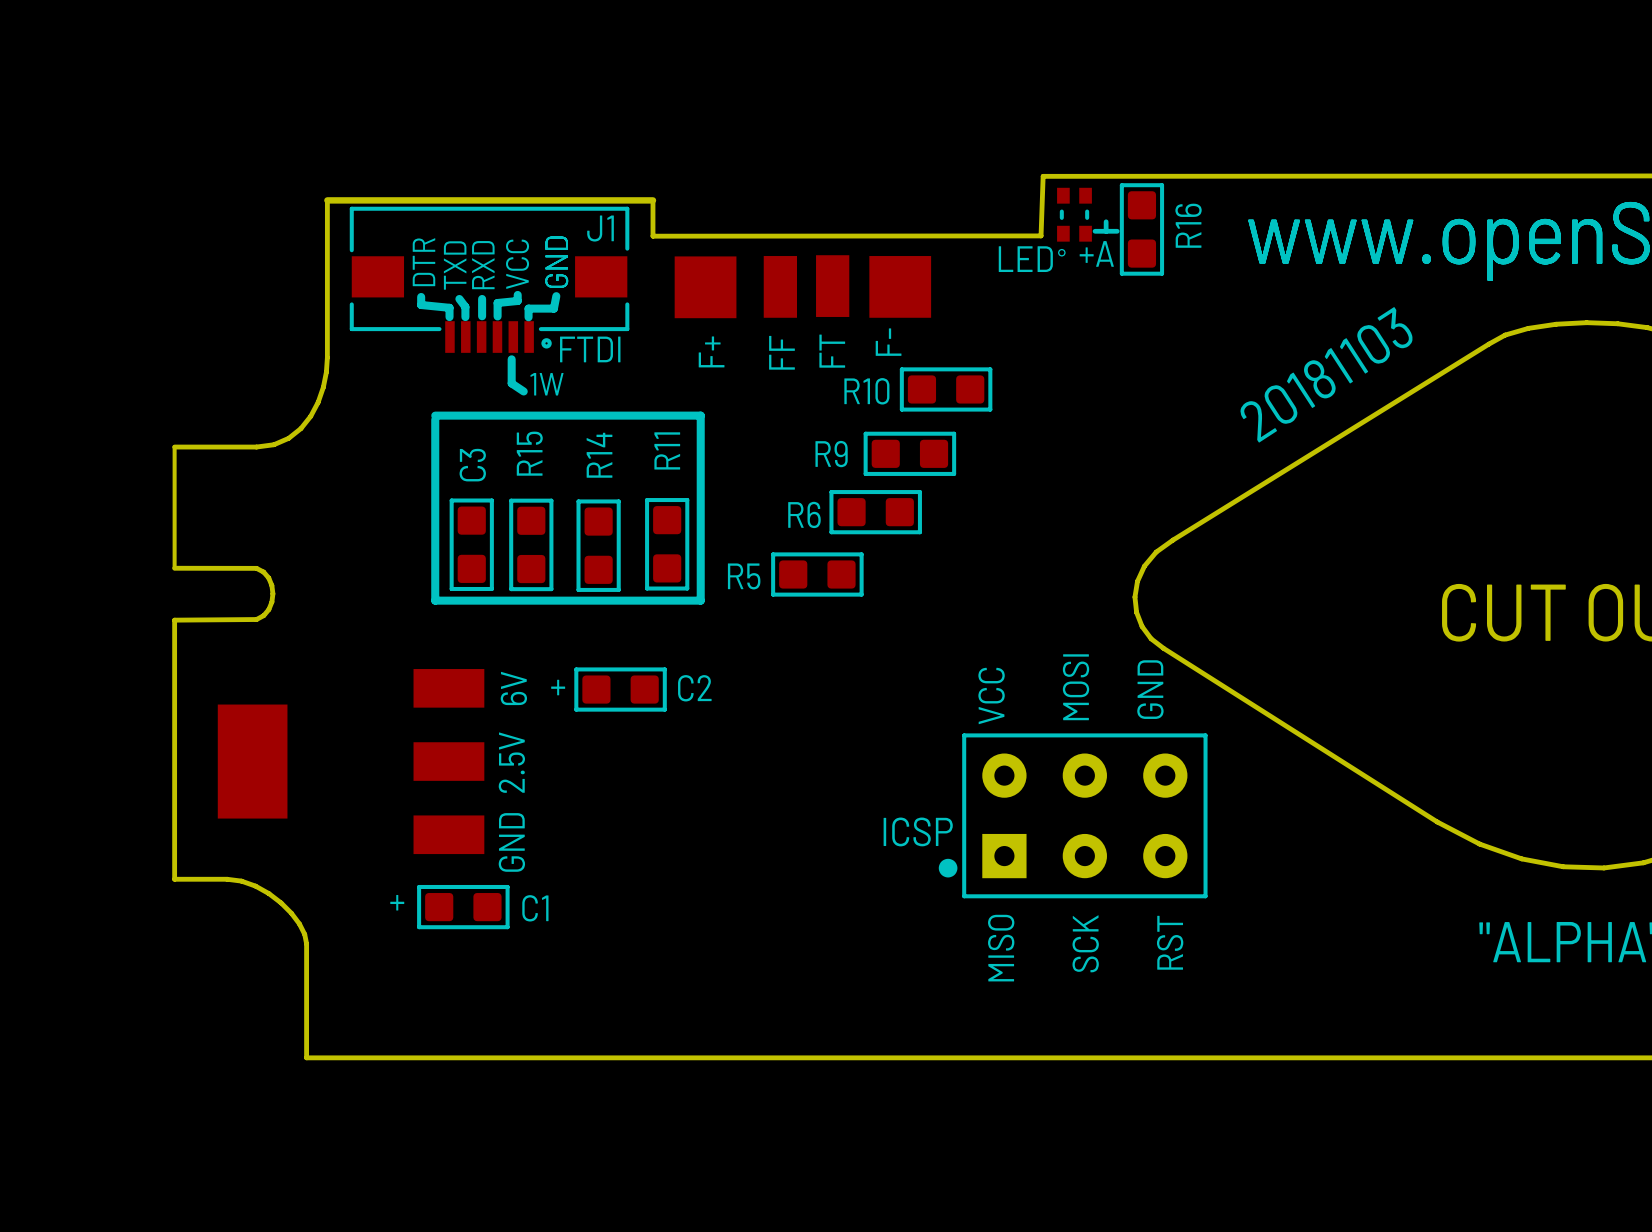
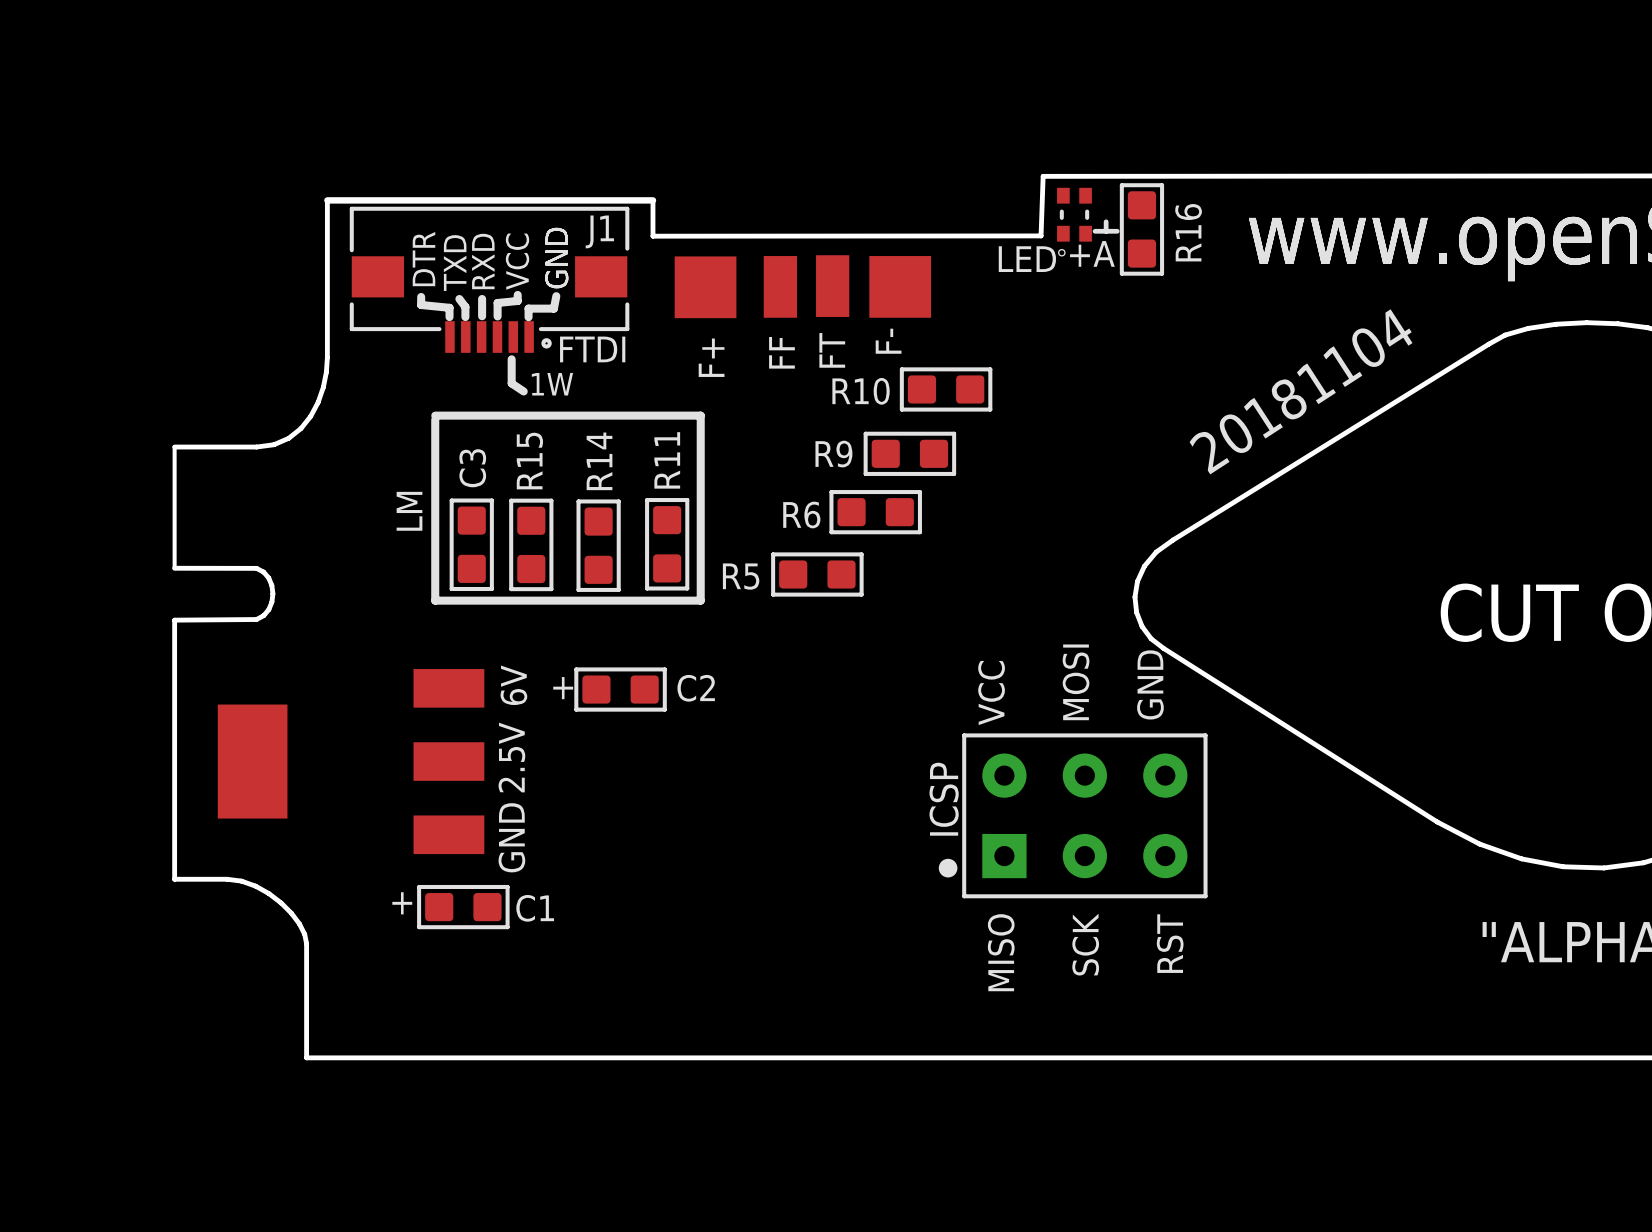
text: 20181103 (1326, 374) -> 20181104 (1301, 391)
text: none -> LM (409, 511)
ICSP name rotation: 0° (918, 831) -> 90° counterclockwise (944, 799)

